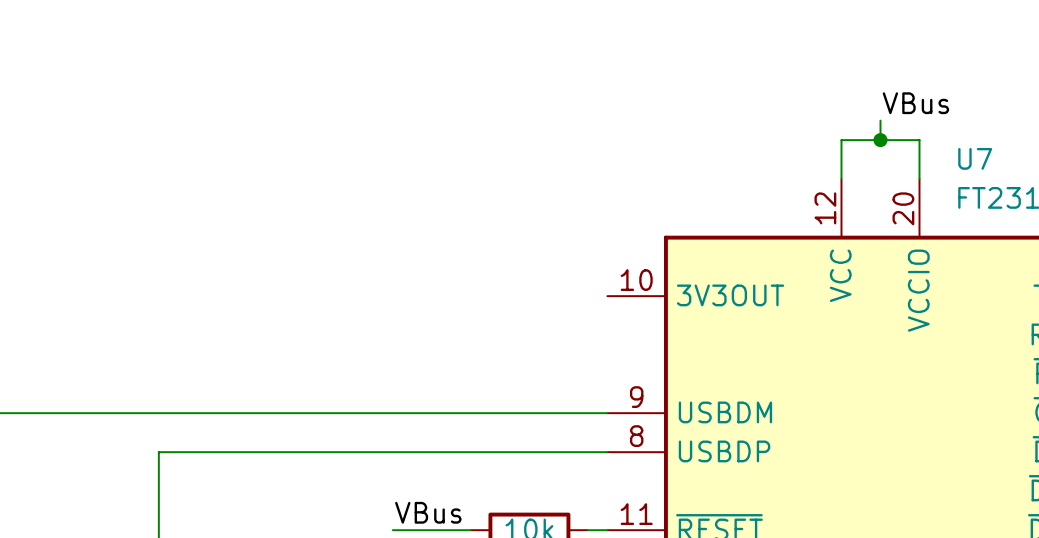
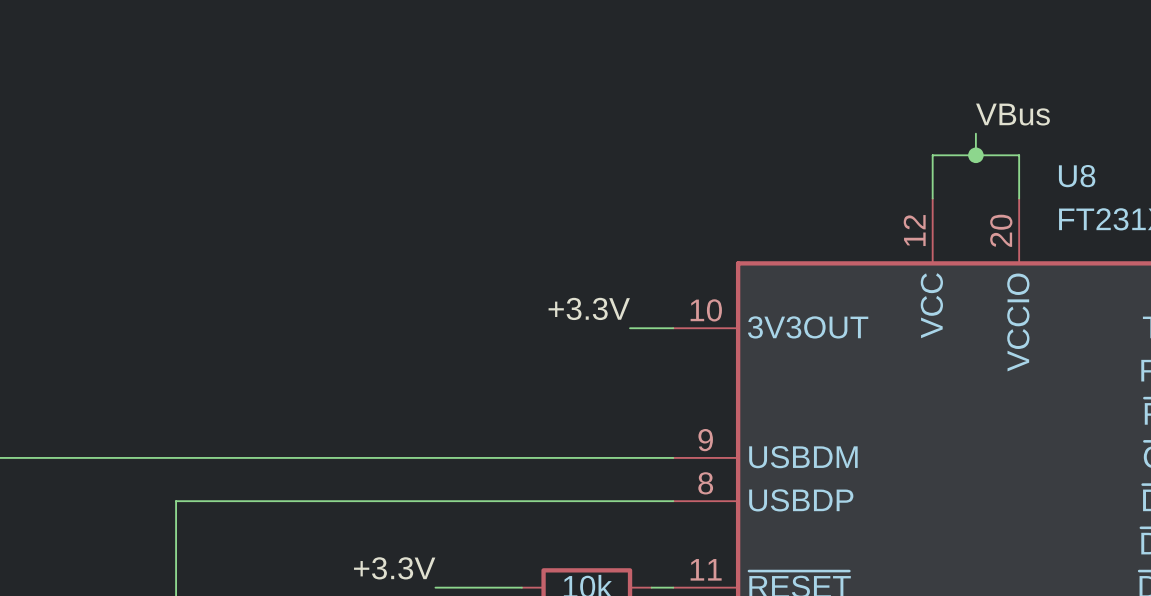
U7 name: U7 (975, 158) -> U8 (1077, 176)
label: none -> +3.3V (589, 308)
wire: none -> (630, 328) (673, 328)
label: VBus (428, 512) -> +3.3V (394, 568)

